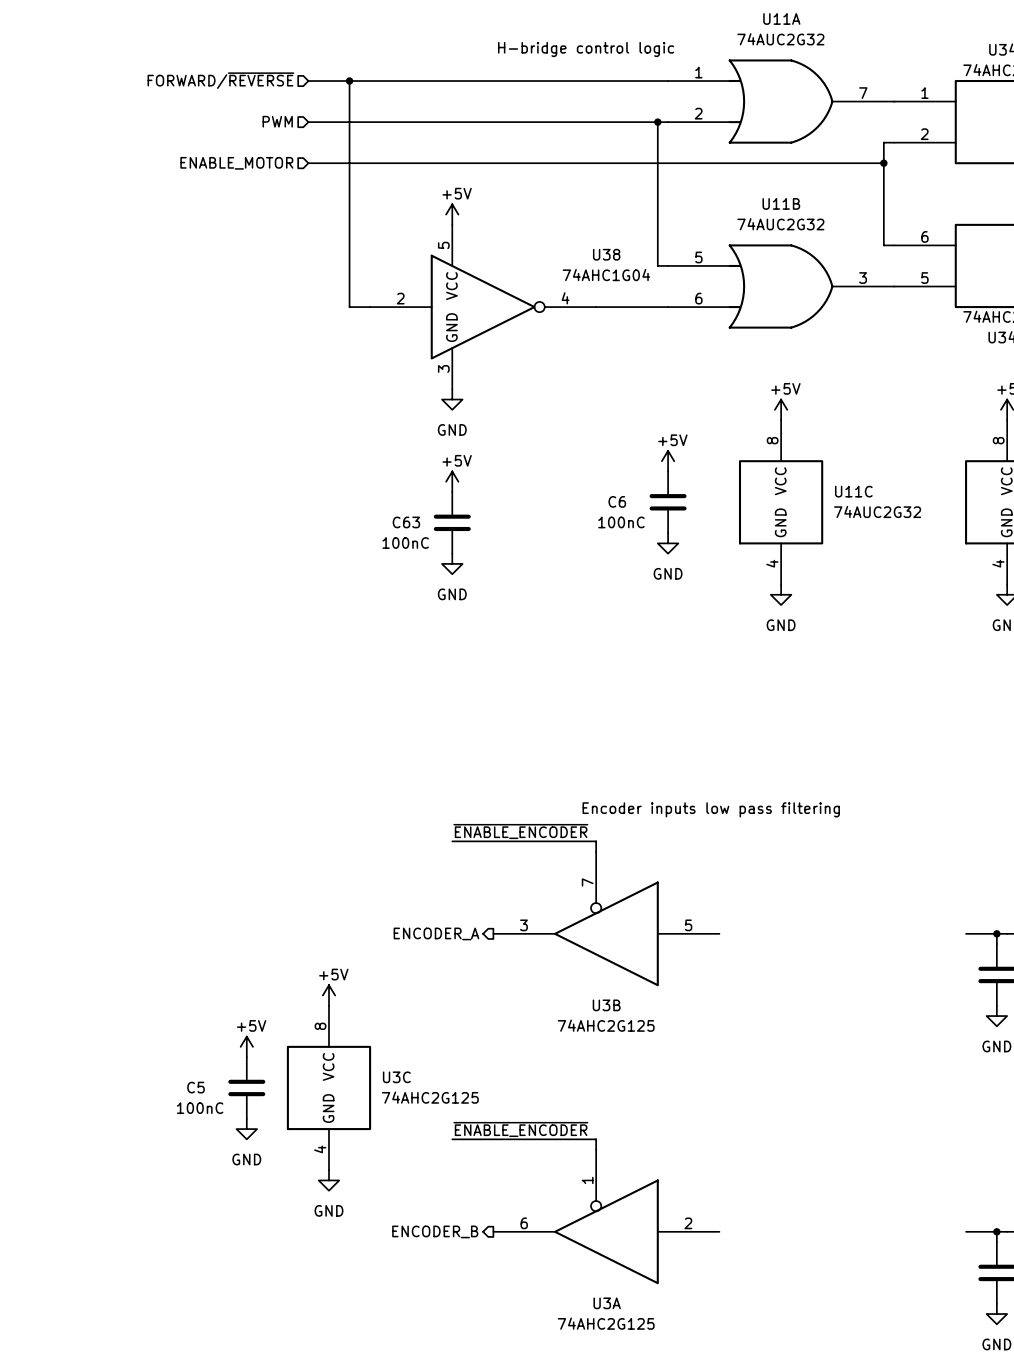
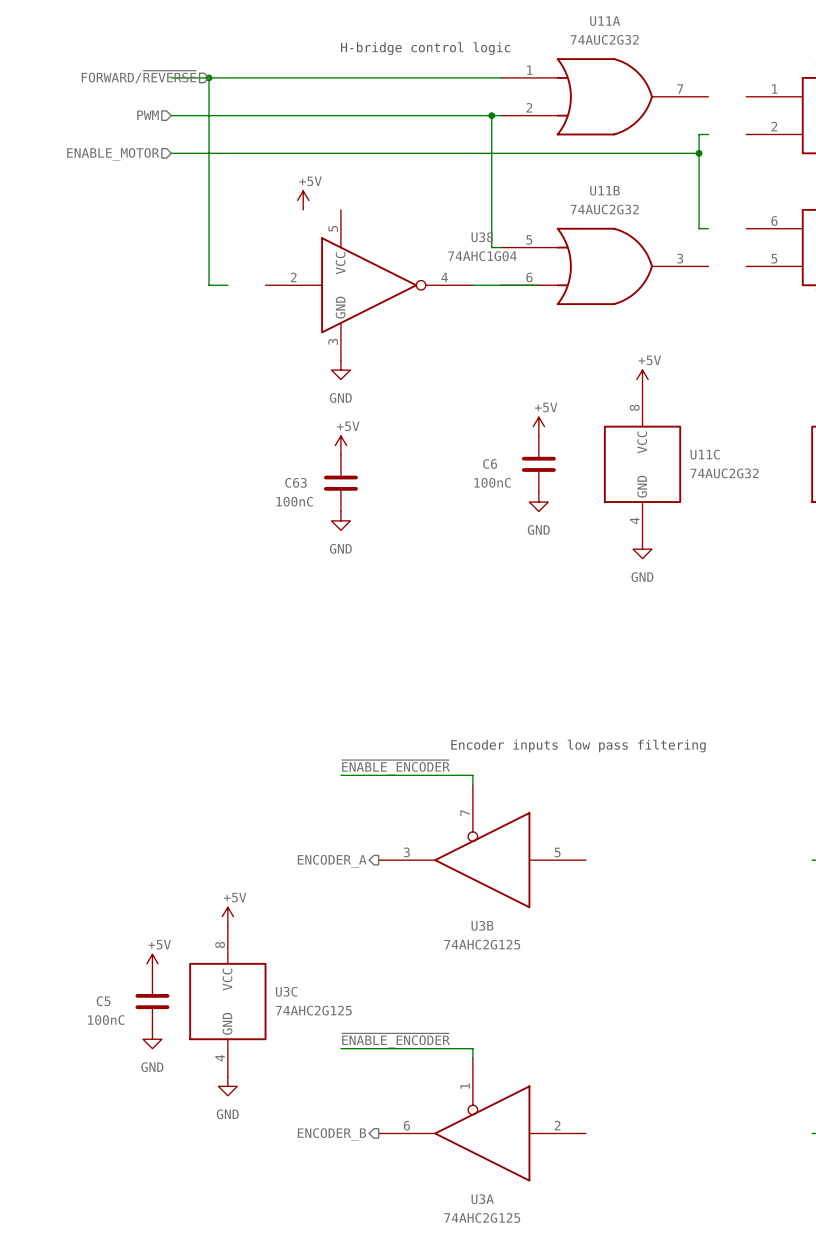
text position: H-bridge control logic (586, 49) -> H-bridge control logic (425, 48)
wire: none -> (171, 77) (208, 77) (208, 285) (227, 285)
wire: (349, 81) (349, 307) (370, 307) -> none
junction position: (349, 81) -> (208, 77)
U11A position: (781, 101) -> (604, 96)
hierarchical label position: PWM (277, 121) -> PWM (148, 115)
wire: none -> (171, 115) (208, 115)
wire: (657, 122) (657, 265) (668, 265) -> (491, 115) (491, 247) (501, 247)
junction position: (657, 122) -> (491, 115)
wire: (894, 142) (883, 142) (883, 245) (894, 245) -> (708, 134) (699, 134) (699, 228) (708, 228)
hierarchical label position: ENABLE_MOTOR (236, 163) -> ENABLE_MOTOR (113, 154)
wire: none -> (171, 153) (208, 153)
wire: (842, 163) (883, 163) -> none
junction position: (883, 163) -> (699, 153)
power symbol position: +5V (452, 214) -> +5V (303, 200)
U11B position: (781, 286) -> (604, 266)

